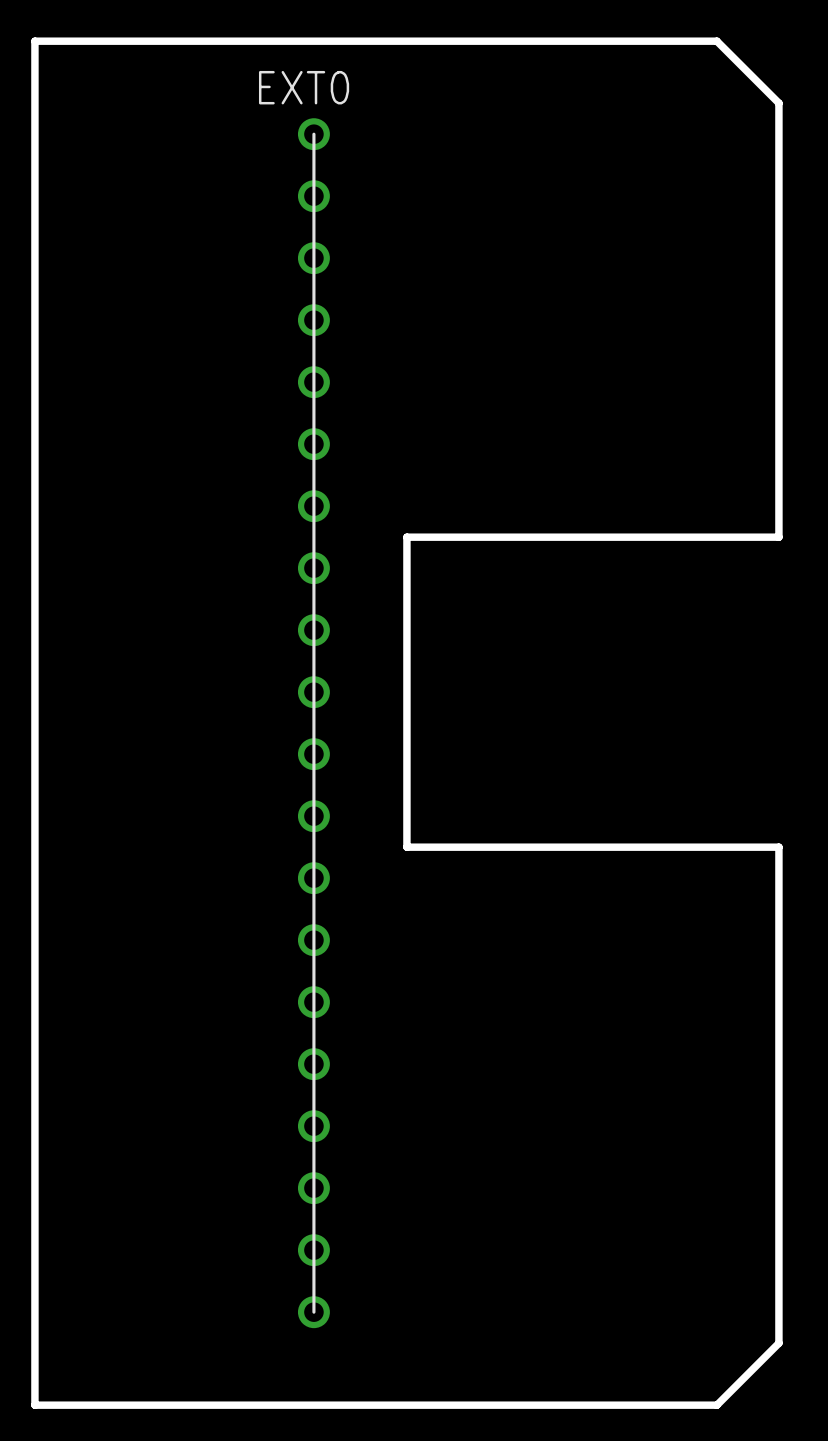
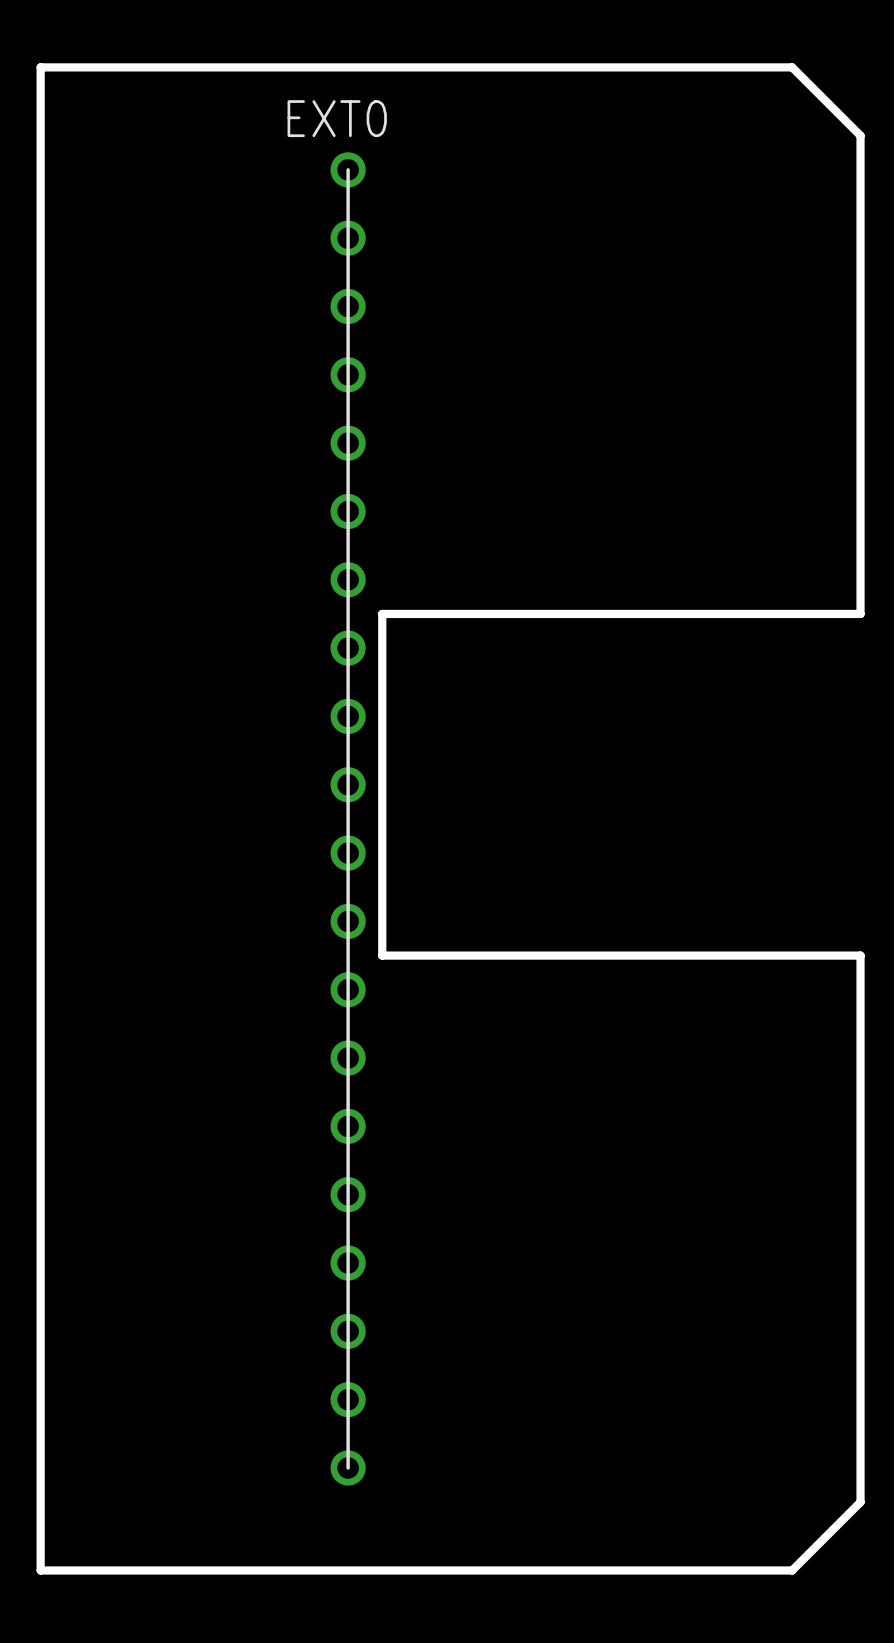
board edge: (406, 537) (406, 847) -> (450, 613) (382, 613) (382, 955) (450, 955)

